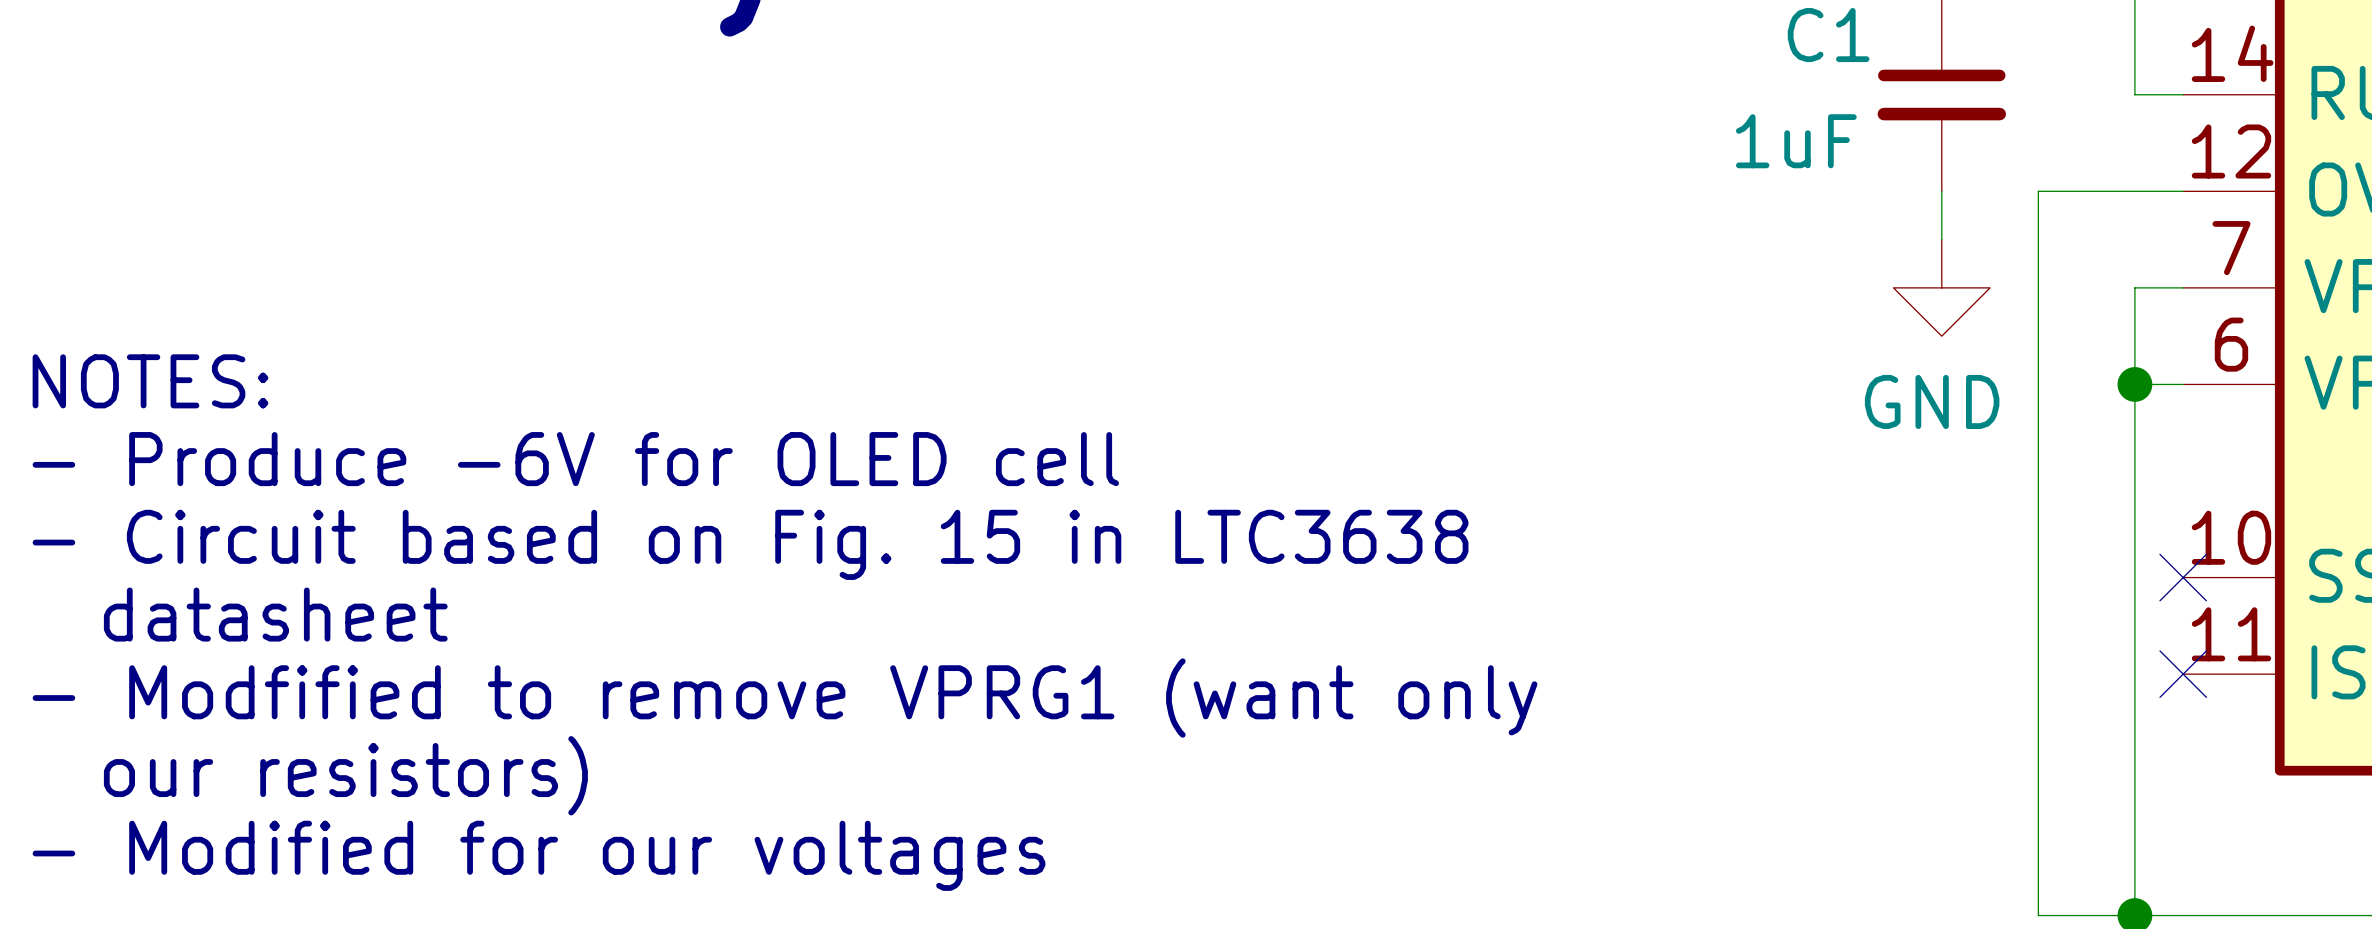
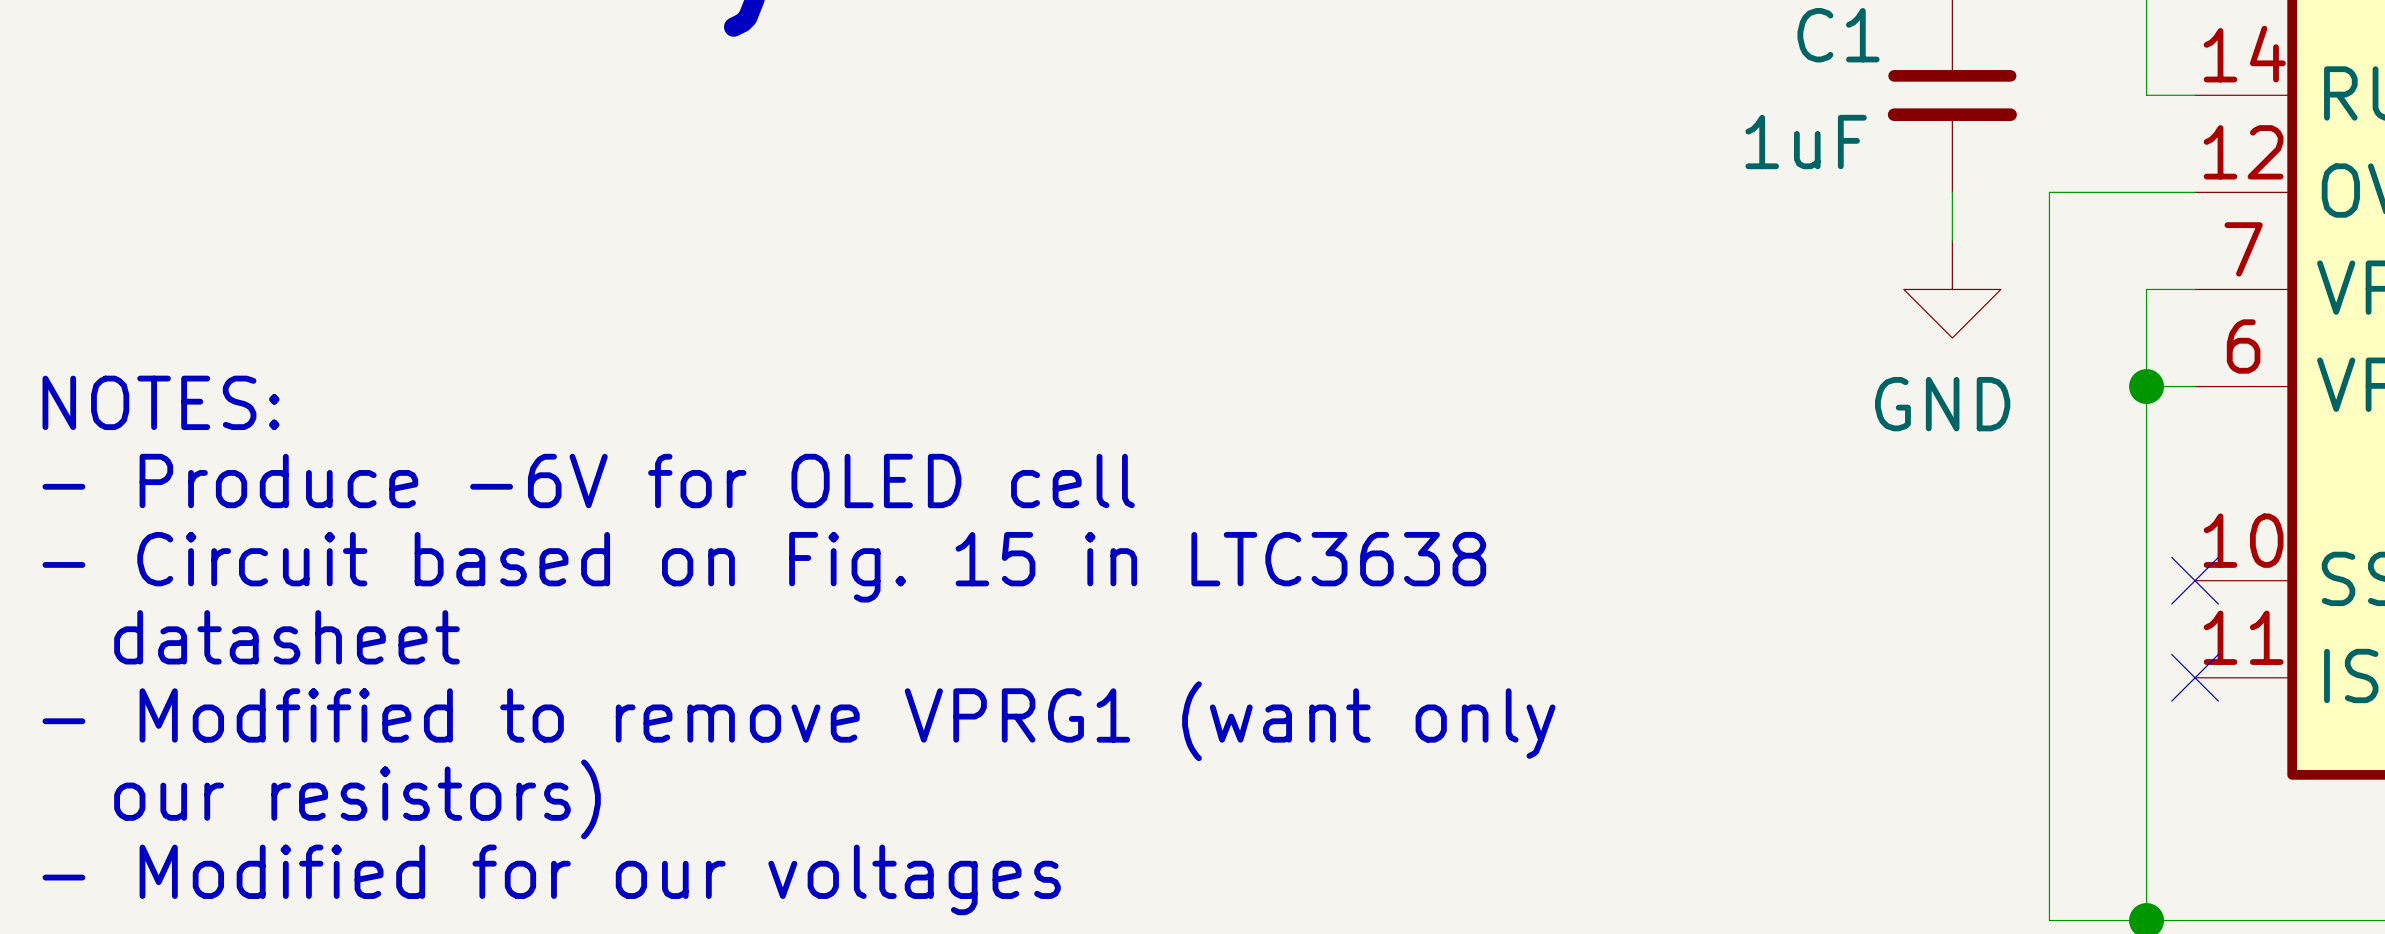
text position: NOTES: (150, 381) -> NOTES: (161, 402)
text position: - Produce -6V for OLED cell (575, 459) -> - Produce -6V for OLED cell (588, 481)
text position: - Circuit based on Fig. 15 in LTC3638 (750, 544) -> - Circuit based on Fig. 15 in LTC3638 (764, 567)
text position: datasheet (275, 614) -> datasheet (286, 637)
text position: - Modfified to remove VPRG1 (want only (785, 698) -> - Modfified to remove VPRG1 (want only (799, 721)
text position: our resistors) (345, 775) -> our resistors) (357, 799)
text position: - Modified for our voltages (539, 855) -> - Modified for our voltages (551, 879)

